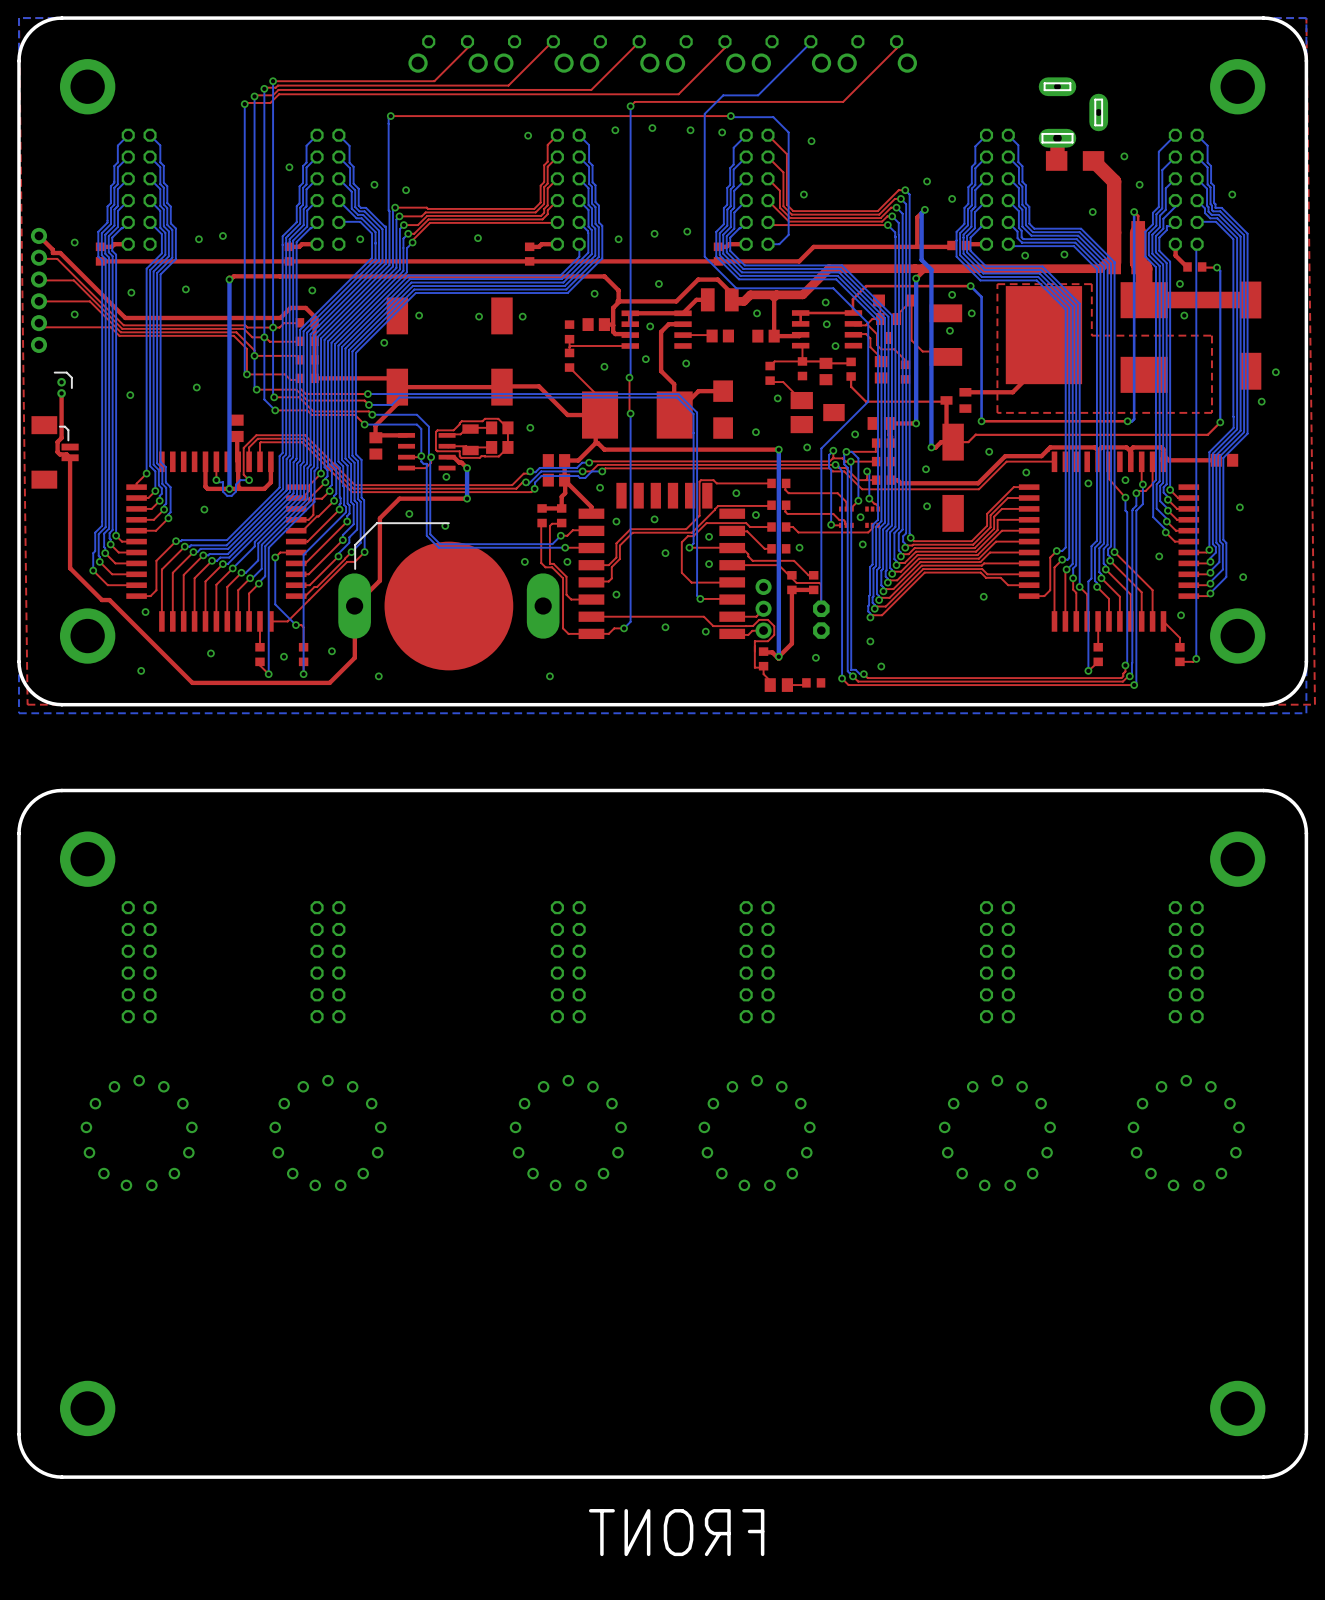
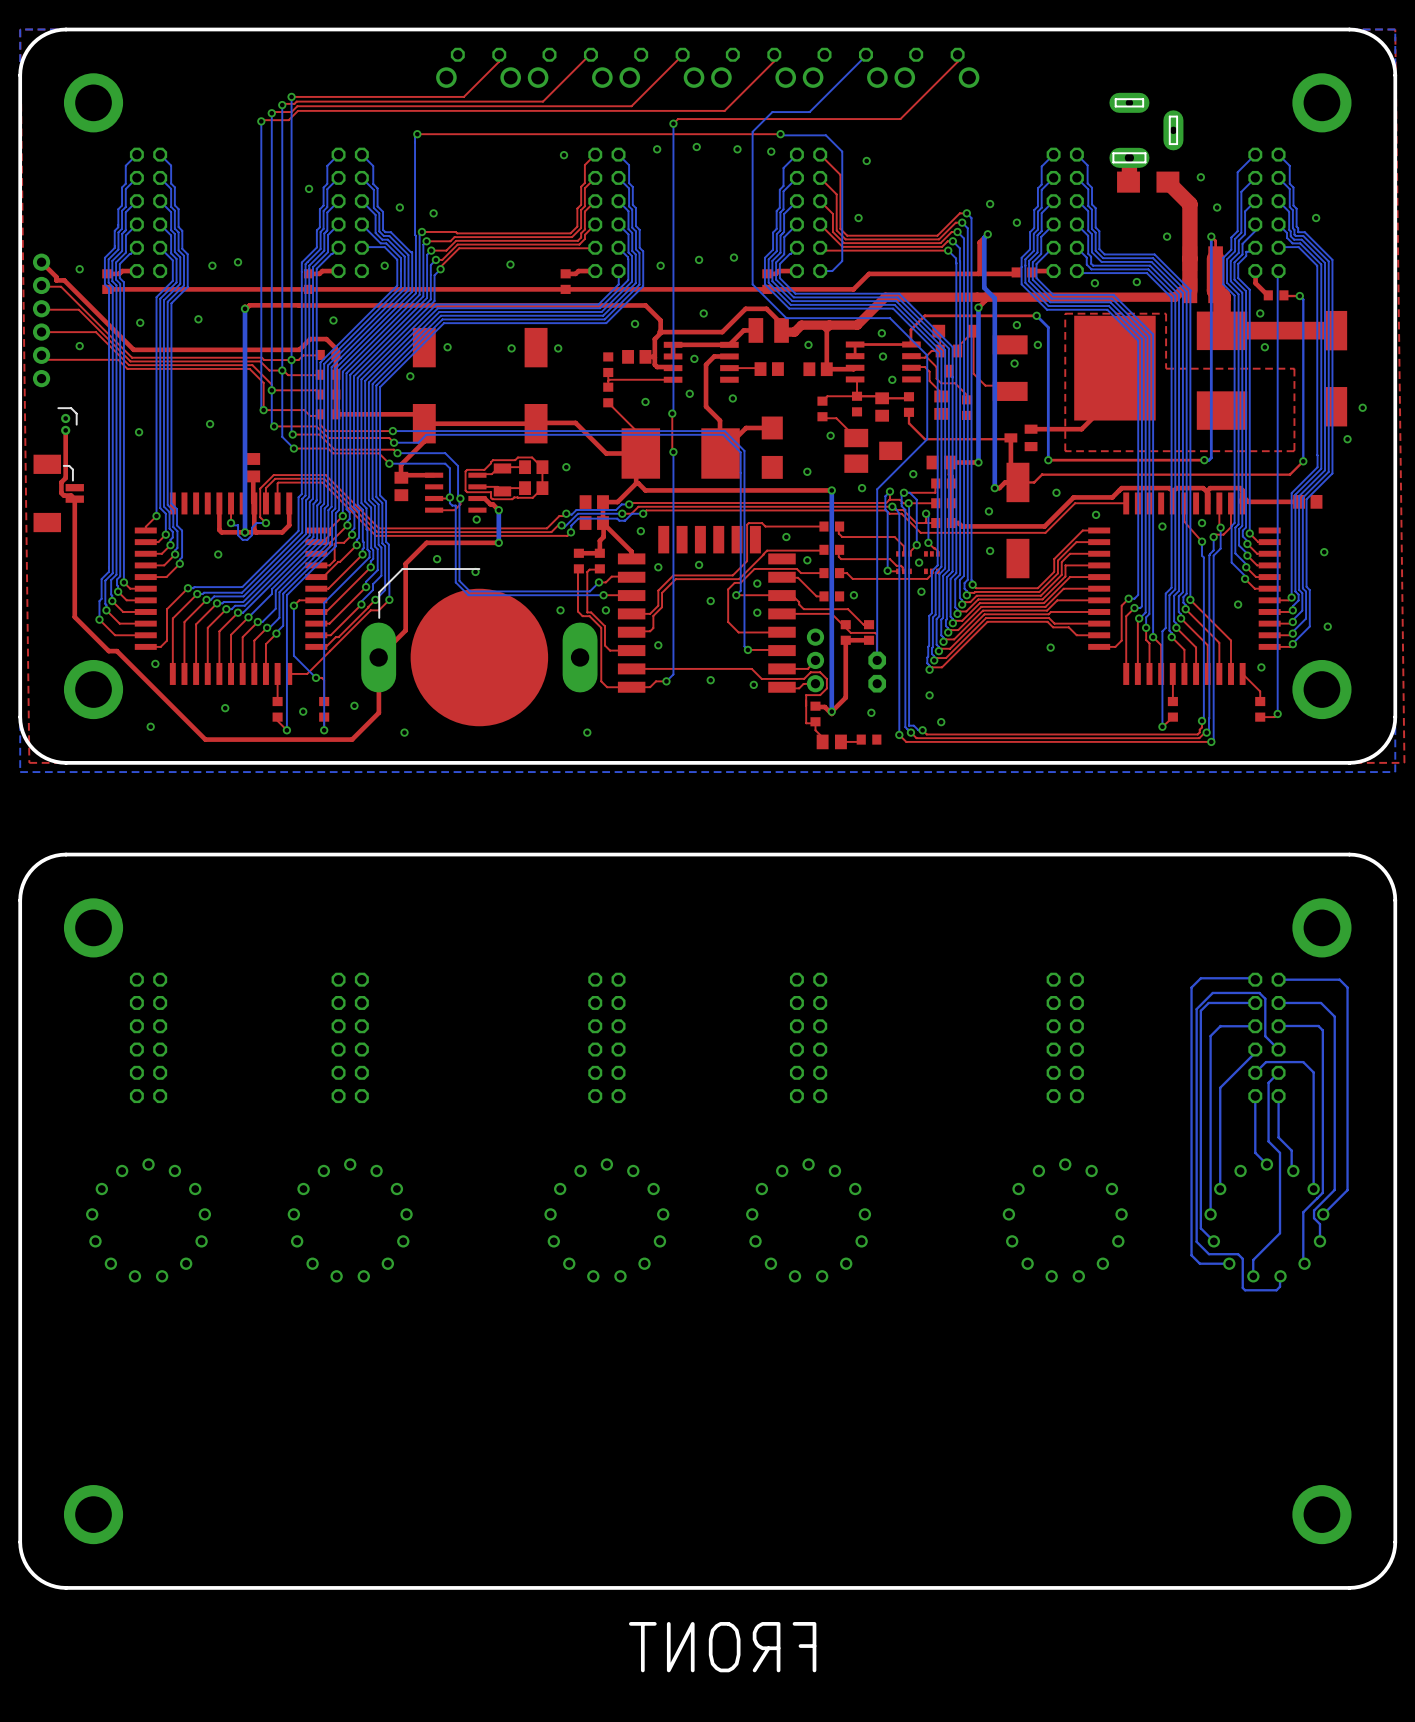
bottom track: none -> (1255, 979) (1200, 978) (1191, 987) (1191, 1255) (1199, 1263) (1229, 1263)
bottom track: none -> (1278, 979) (1339, 979) (1347, 987) (1347, 1190) (1323, 1214)
bottom track: none -> (1255, 1002) (1208, 1002) (1200, 1010) (1200, 1228) (1213, 1241)
bottom track: none -> (1278, 1002) (1321, 1002) (1334, 1016) (1334, 1189) (1314, 1210) (1314, 1218) (1319, 1224) (1319, 1241)
bottom track: none -> (1255, 1026) (1220, 1026) (1210, 1036) (1210, 1214)
bottom track: none -> (1278, 1026) (1318, 1026) (1322, 1030) (1322, 1192) (1317, 1198)
bottom track: none -> (1255, 1049) (1255, 1052) (1220, 1087) (1220, 1189)
bottom track: none -> (1278, 1049) (1265, 1036) (1265, 998) (1259, 992) (1212, 992) (1196, 1009) (1196, 1241) (1209, 1254) (1238, 1254) (1242, 1258) (1242, 1287) (1245, 1290) (1276, 1290) (1280, 1286) (1280, 1276)
bottom track: none -> (1255, 1072) (1266, 1062) (1303, 1062) (1313, 1072) (1313, 1189)
bottom track: none -> (1278, 1072) (1268, 1082) (1268, 1141) (1280, 1152) (1280, 1233) (1253, 1260) (1253, 1276)
bottom track: none -> (1255, 1096) (1255, 1152) (1266, 1164)
bottom track: none -> (1278, 1096) (1278, 1137) (1291, 1150) (1291, 1169) (1293, 1170)
bottom track: none -> (1317, 1198) (1303, 1212) (1304, 1263)

